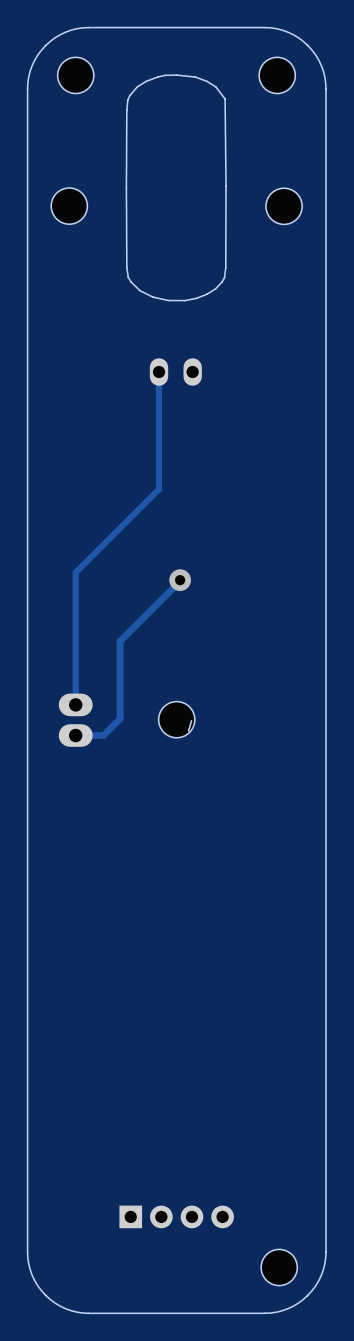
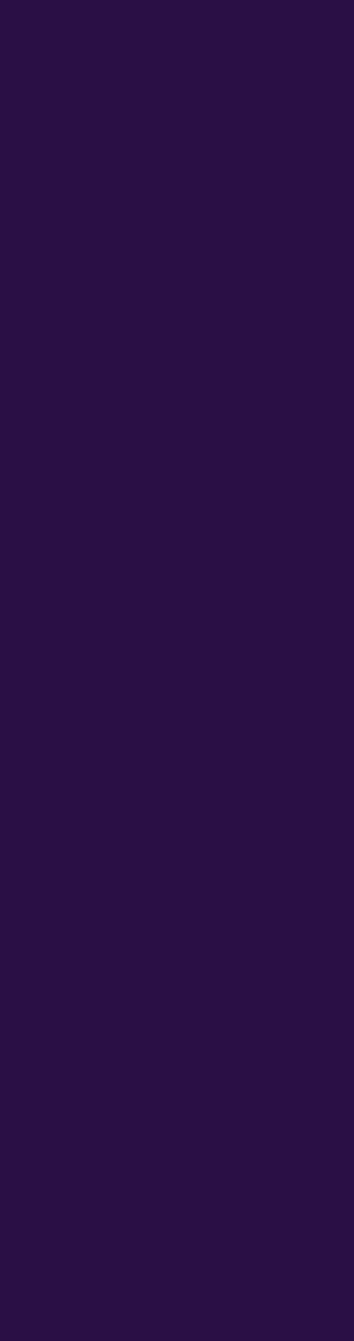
board edge: (264, 27) (76, 28) (60, 34) (45, 46) (34, 60) (27, 82) (27, 1252) (32, 1275) (45, 1294) (60, 1306) (82, 1313) (276, 1312) (293, 1306) (308, 1294) (318, 1280) (325, 1258) (325, 82) (318, 60) (307, 45) (287, 32) (264, 27) -> none
hole: (75, 75) -> none
board edge: (176, 75) (195, 77) (206, 81) (215, 86) (225, 98) (224, 277) (215, 288) (206, 294) (184, 300) (168, 300) (153, 297) (140, 290) (128, 277) (126, 267) (127, 99) (137, 86) (146, 81) (165, 75) (176, 75) -> none
hole: (277, 75) -> none
hole: (69, 206) -> none
hole: (284, 206) -> none
track: (159, 372) (159, 489) (75, 572) (75, 704) -> none
part: (175, 372) -> none
track: (180, 580) (120, 641) (120, 718) (103, 735) (75, 735) -> none
via: (180, 580) -> none
hole: (176, 719) -> none
part: (75, 720) -> none
board edge: (191, 720) (188, 731) -> none
part: (176, 1216) -> none
hole: (279, 1267) -> none

